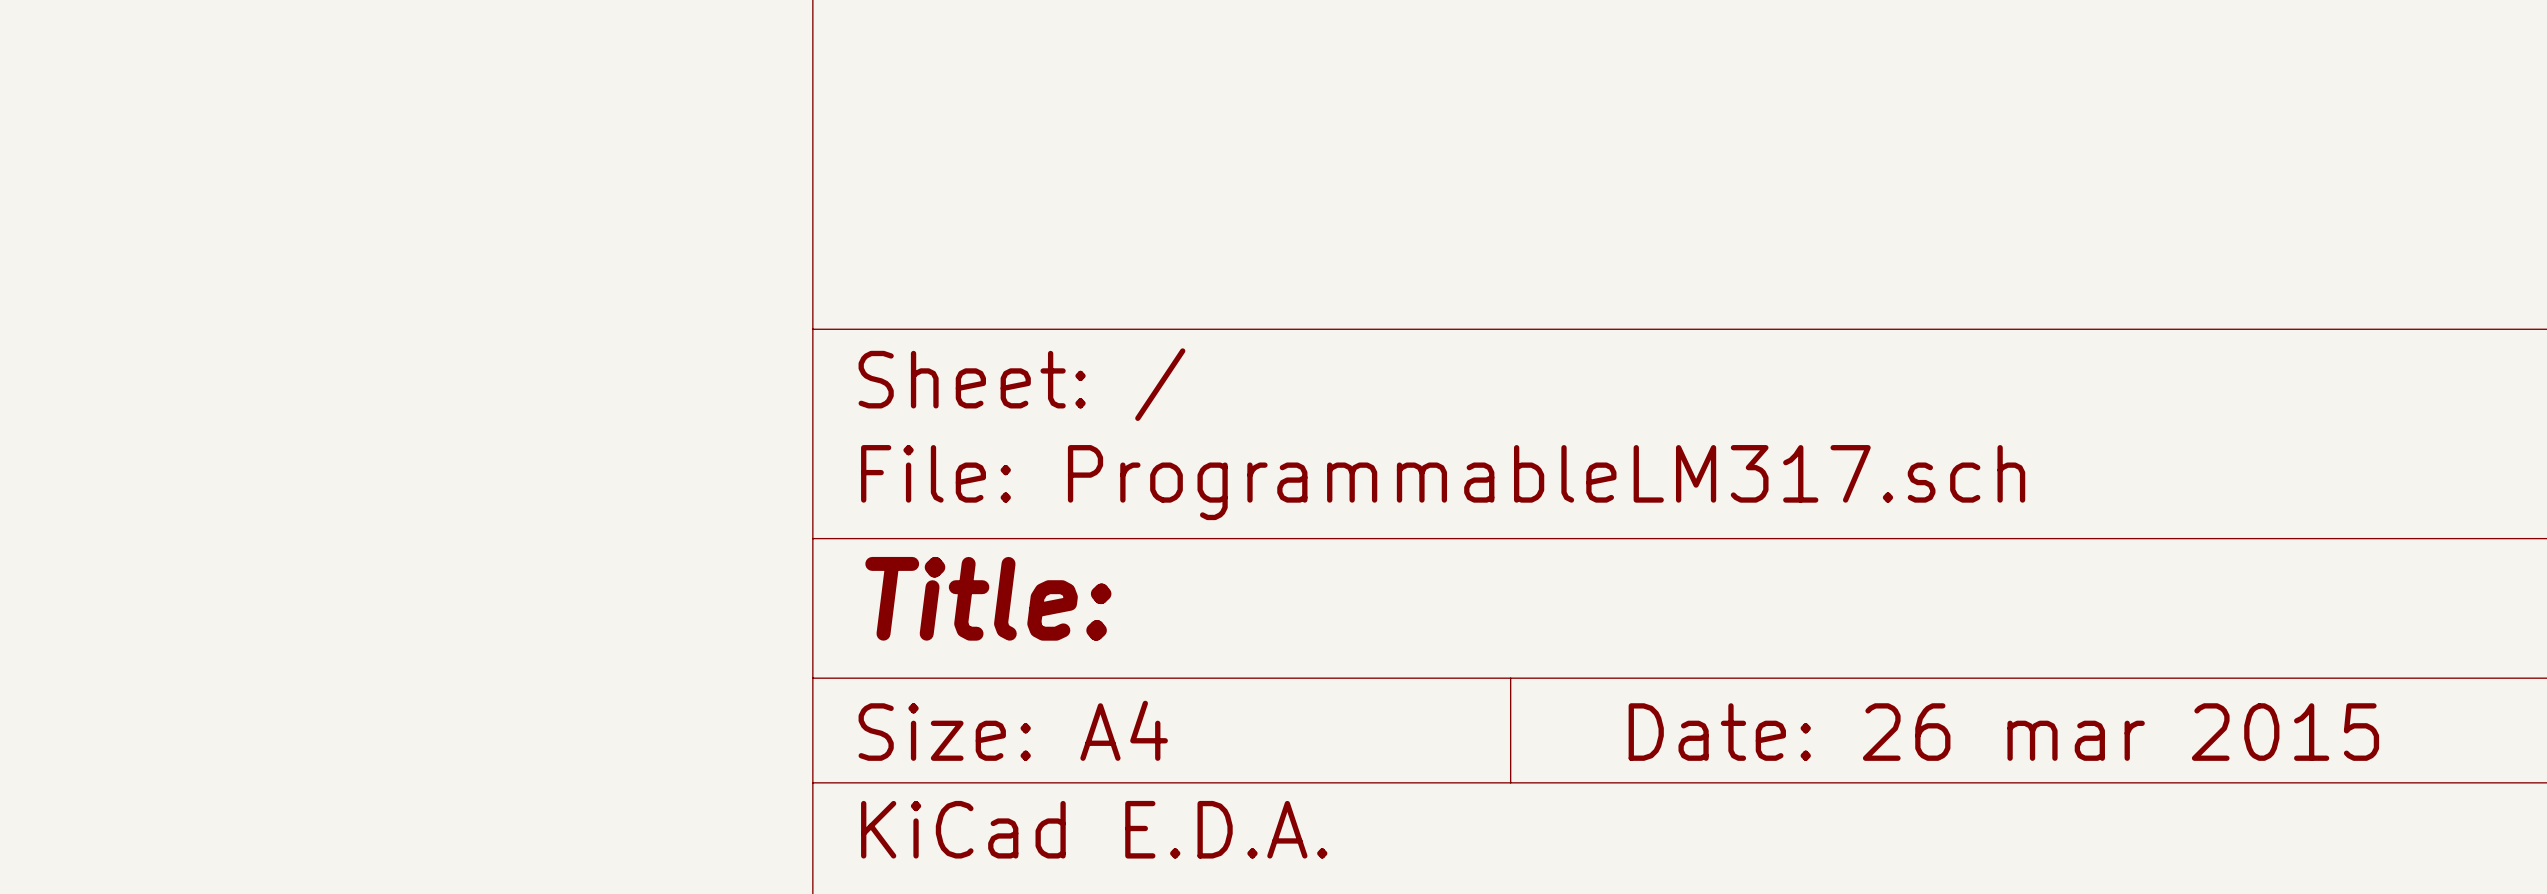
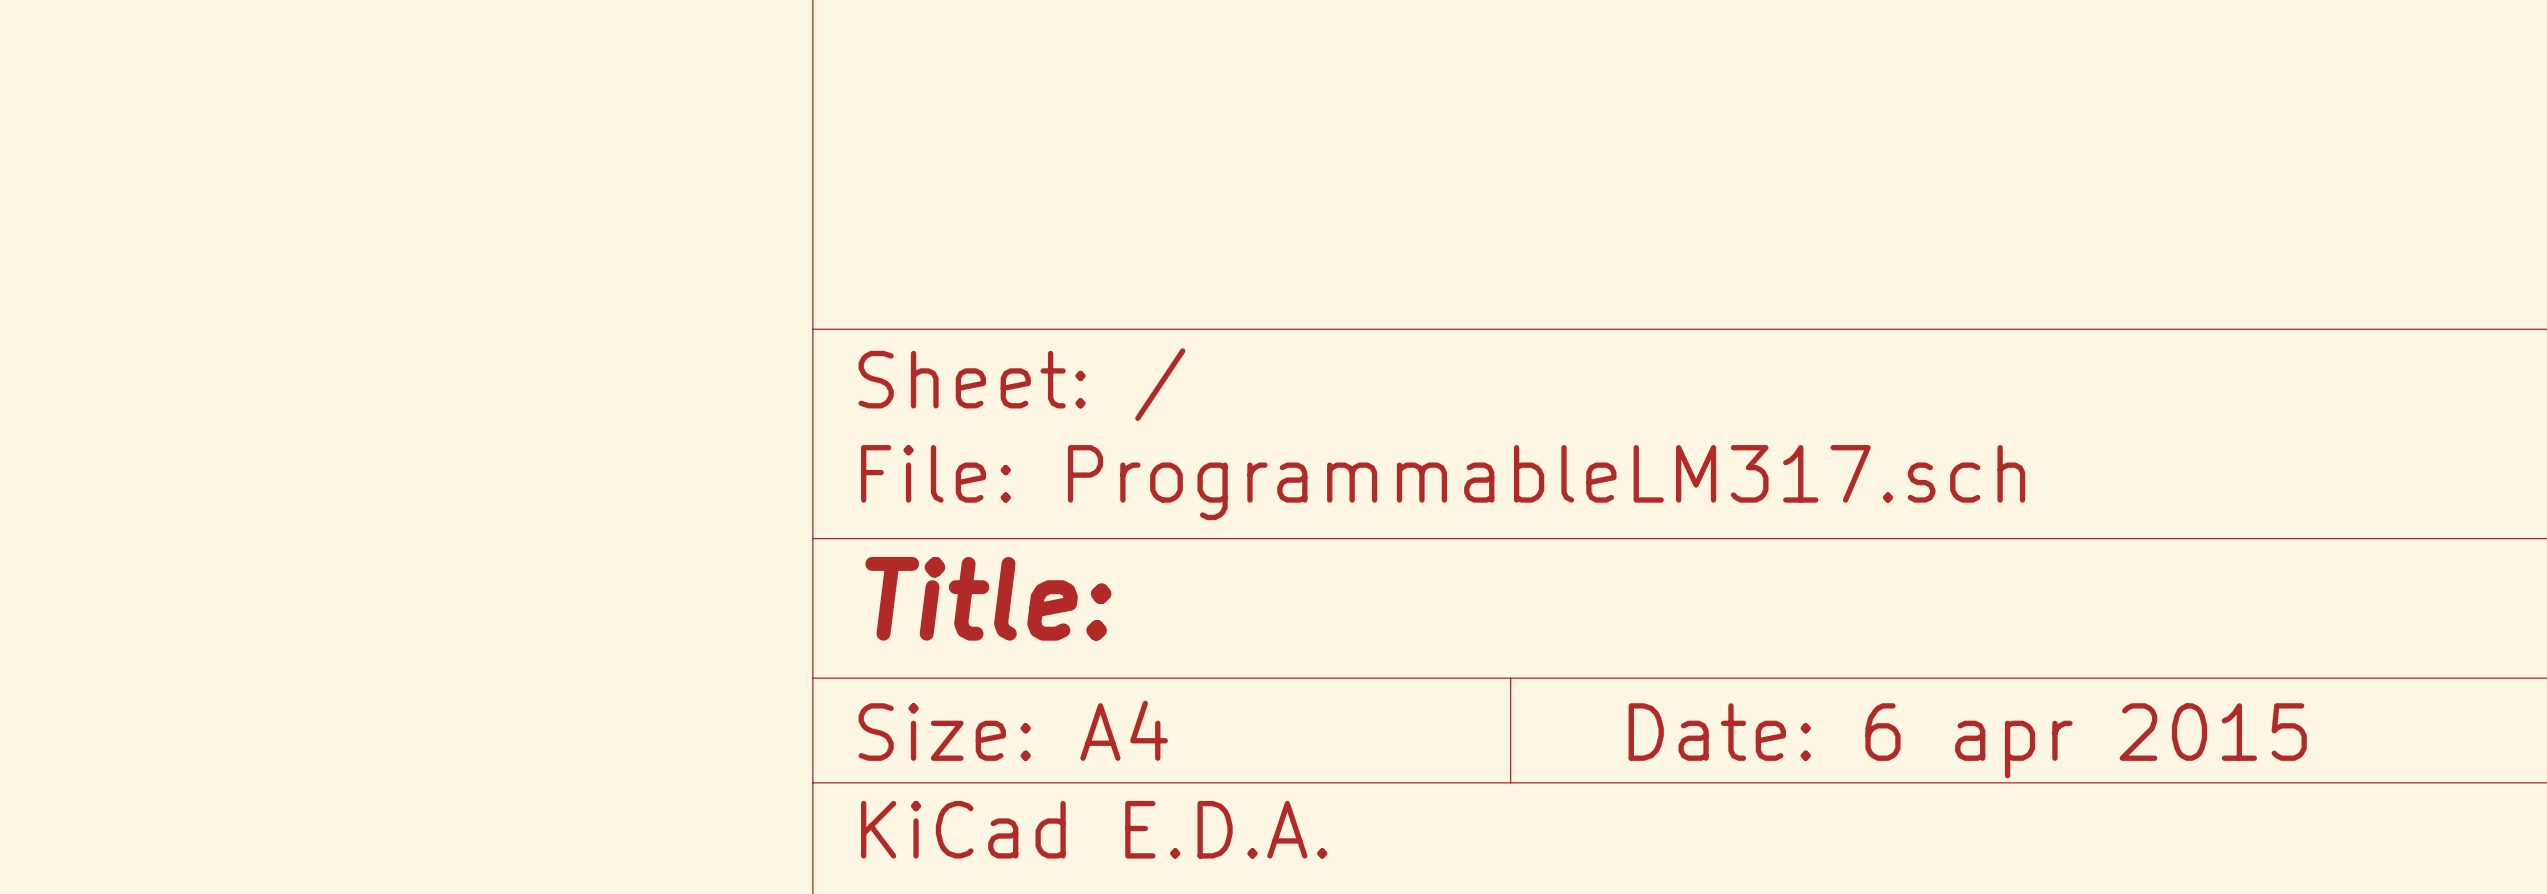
title block: Date: 26 mar 2015 (2003, 732) -> Date: 6 apr 2015 (1967, 740)

